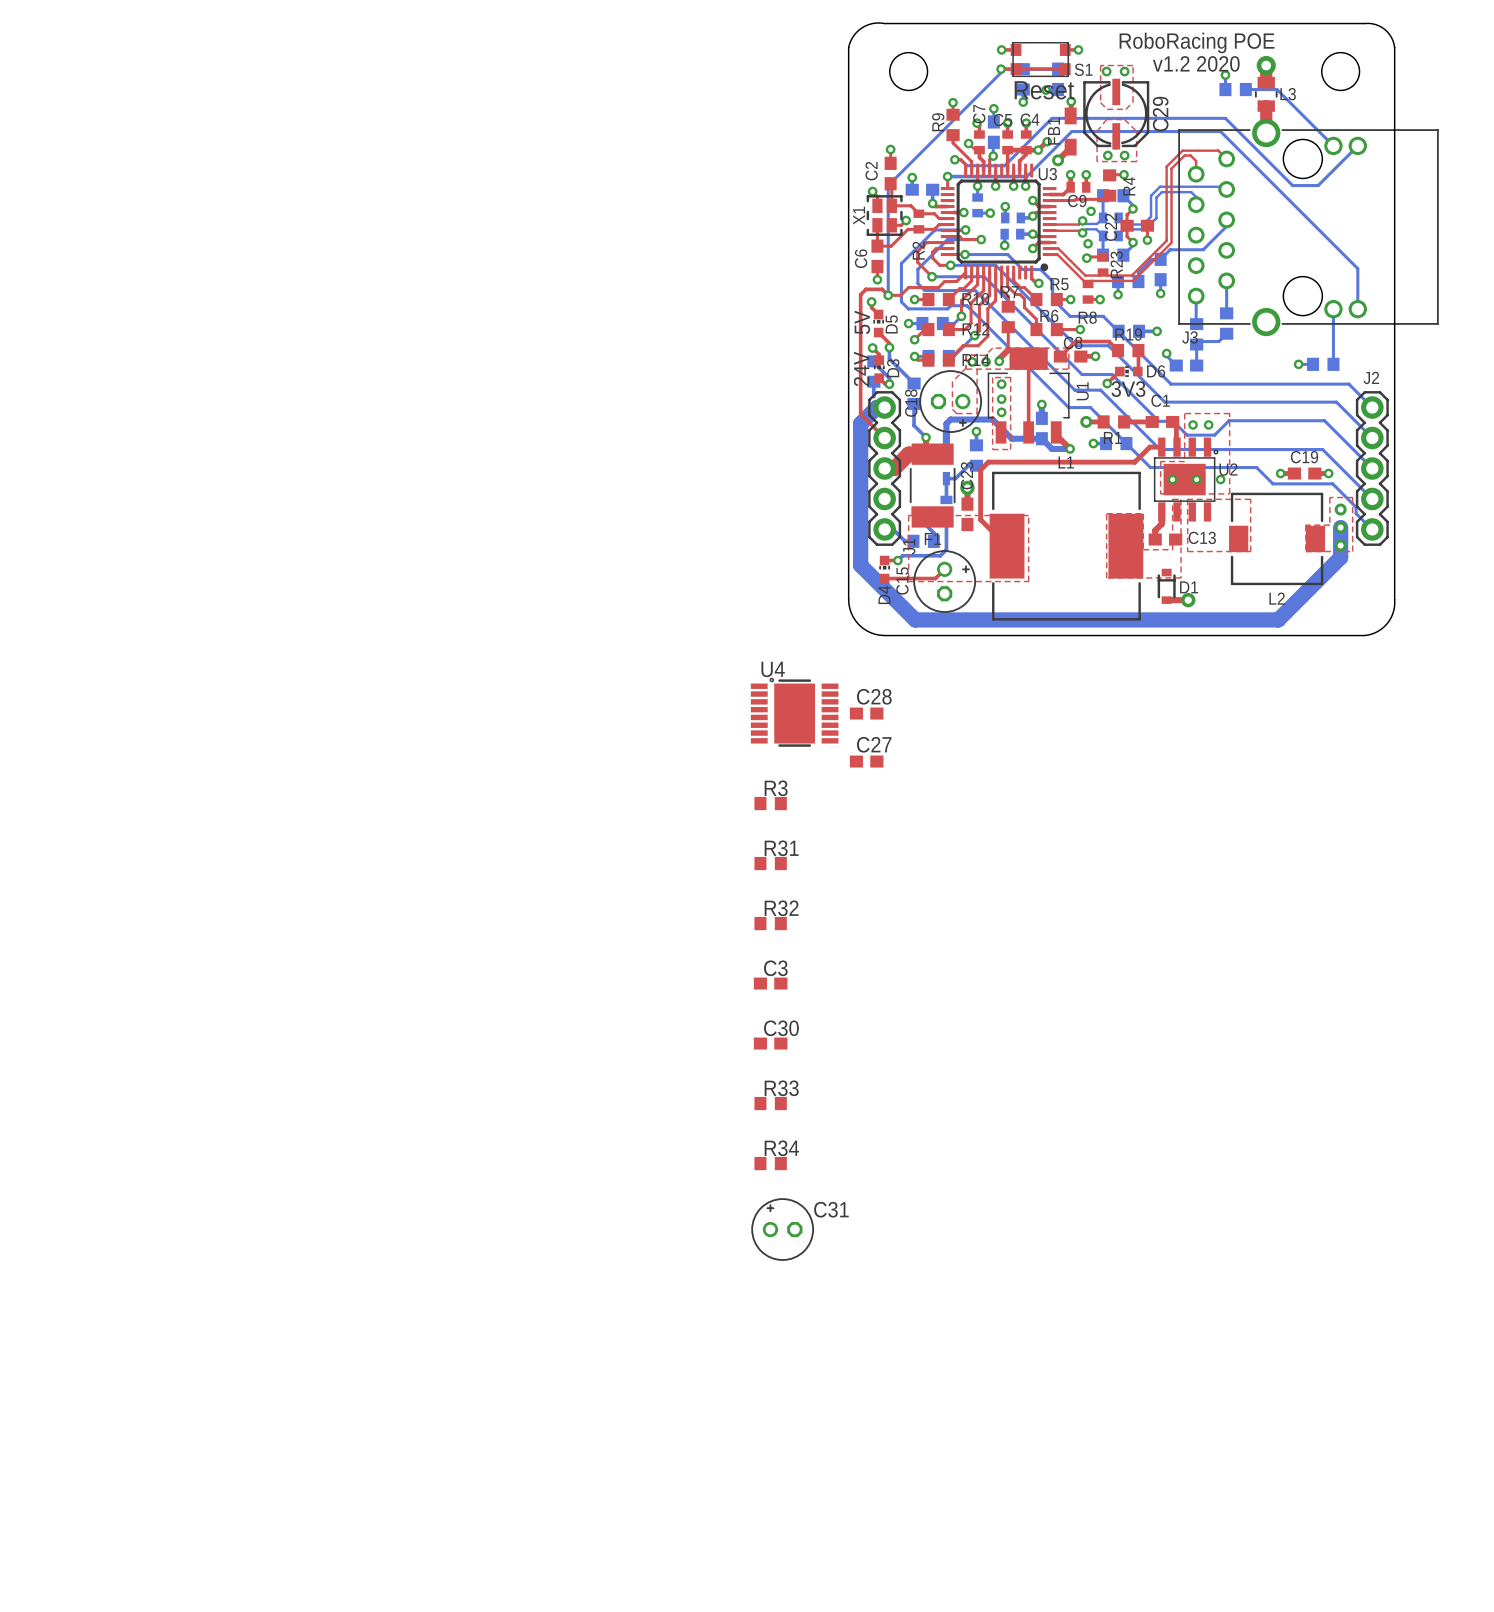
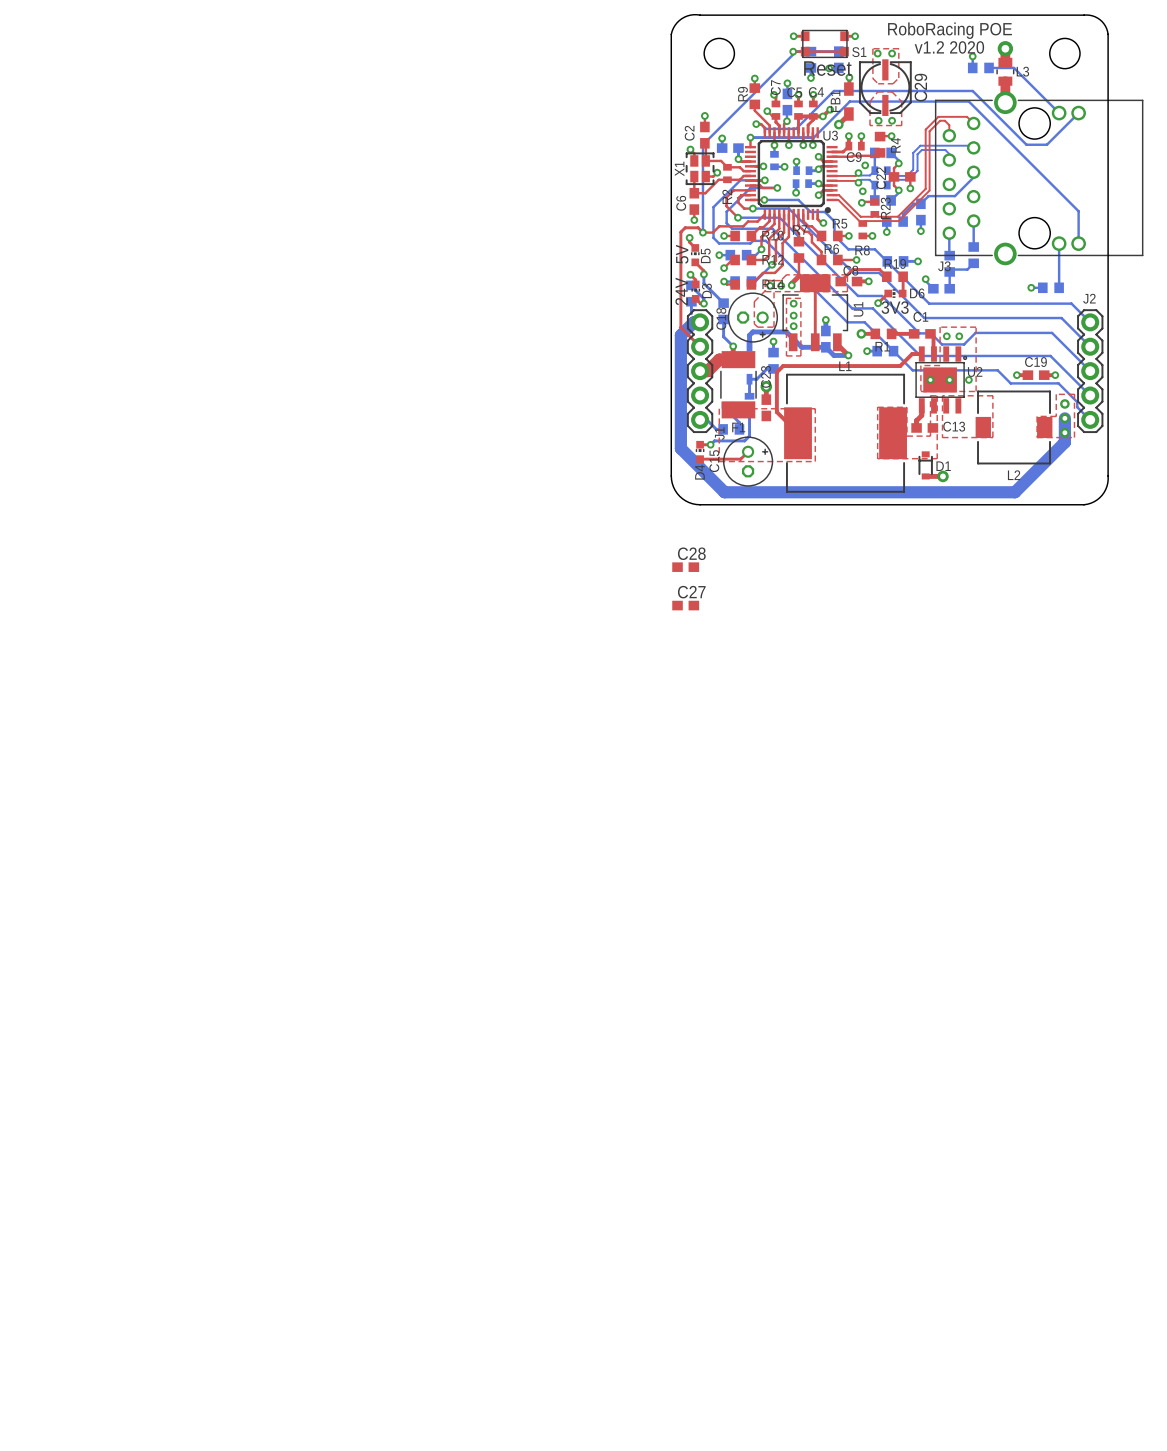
U4: (794, 712) -> none
R3: (770, 803) -> none
R31: (770, 863) -> none
R32: (770, 923) -> none
C3: (770, 983) -> none
C30: (770, 1043) -> none
R33: (770, 1103) -> none
R34: (770, 1163) -> none
C31: (782, 1229) -> none

